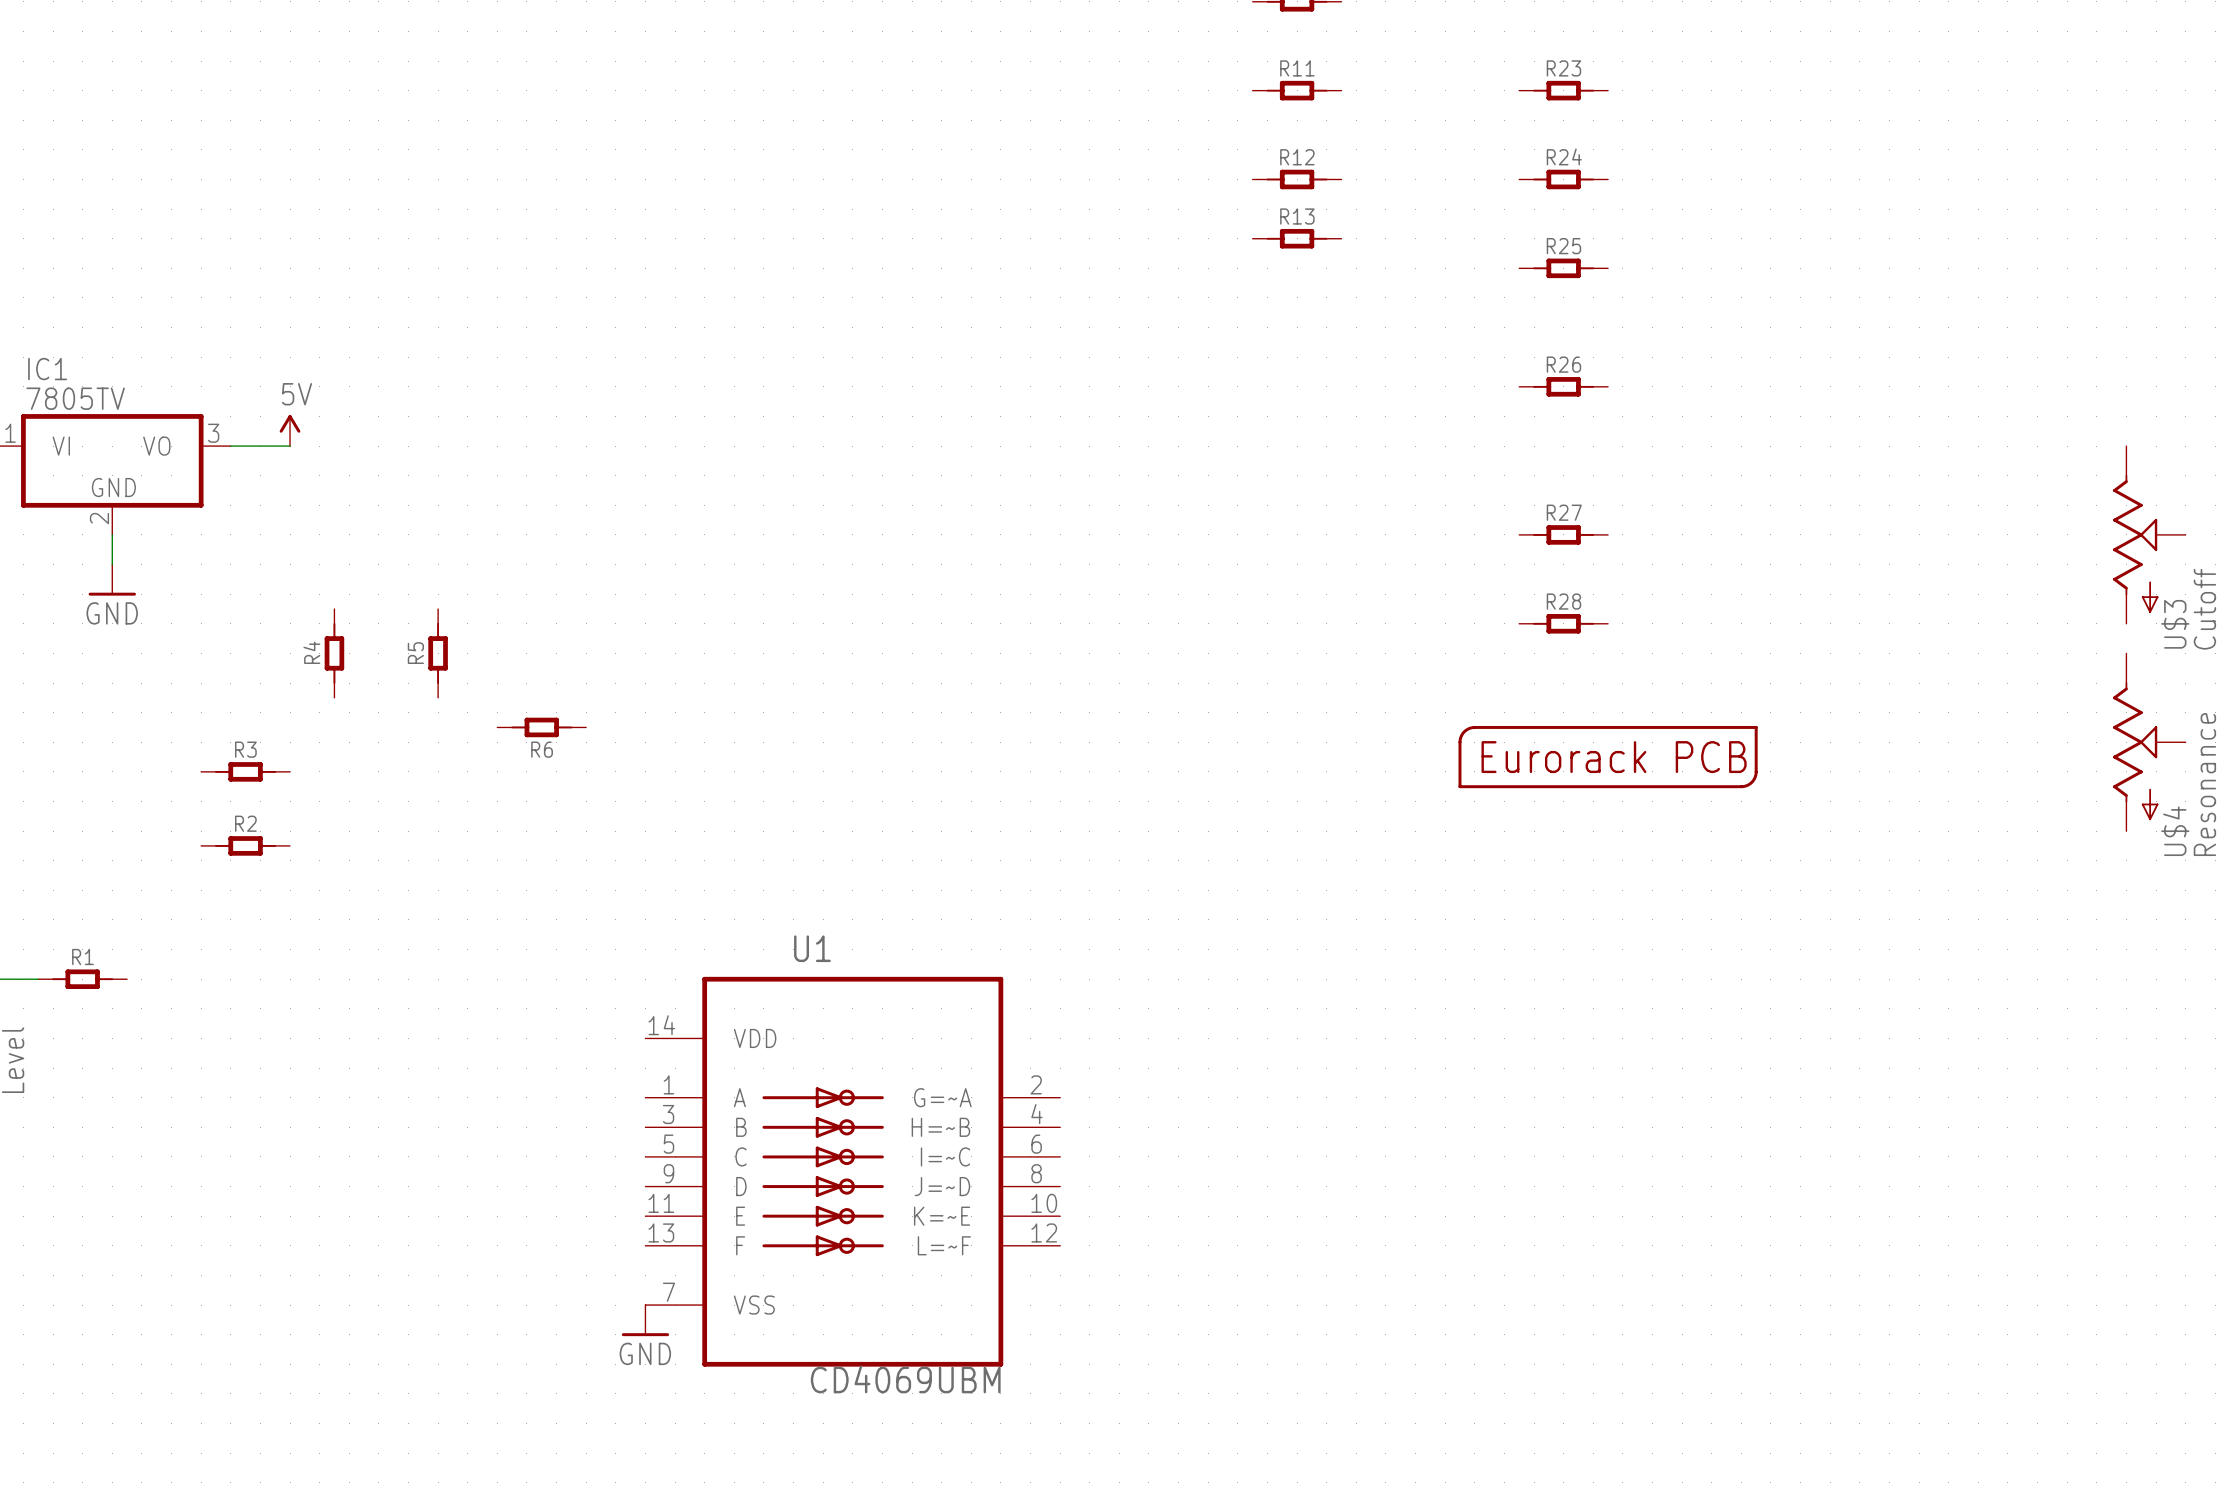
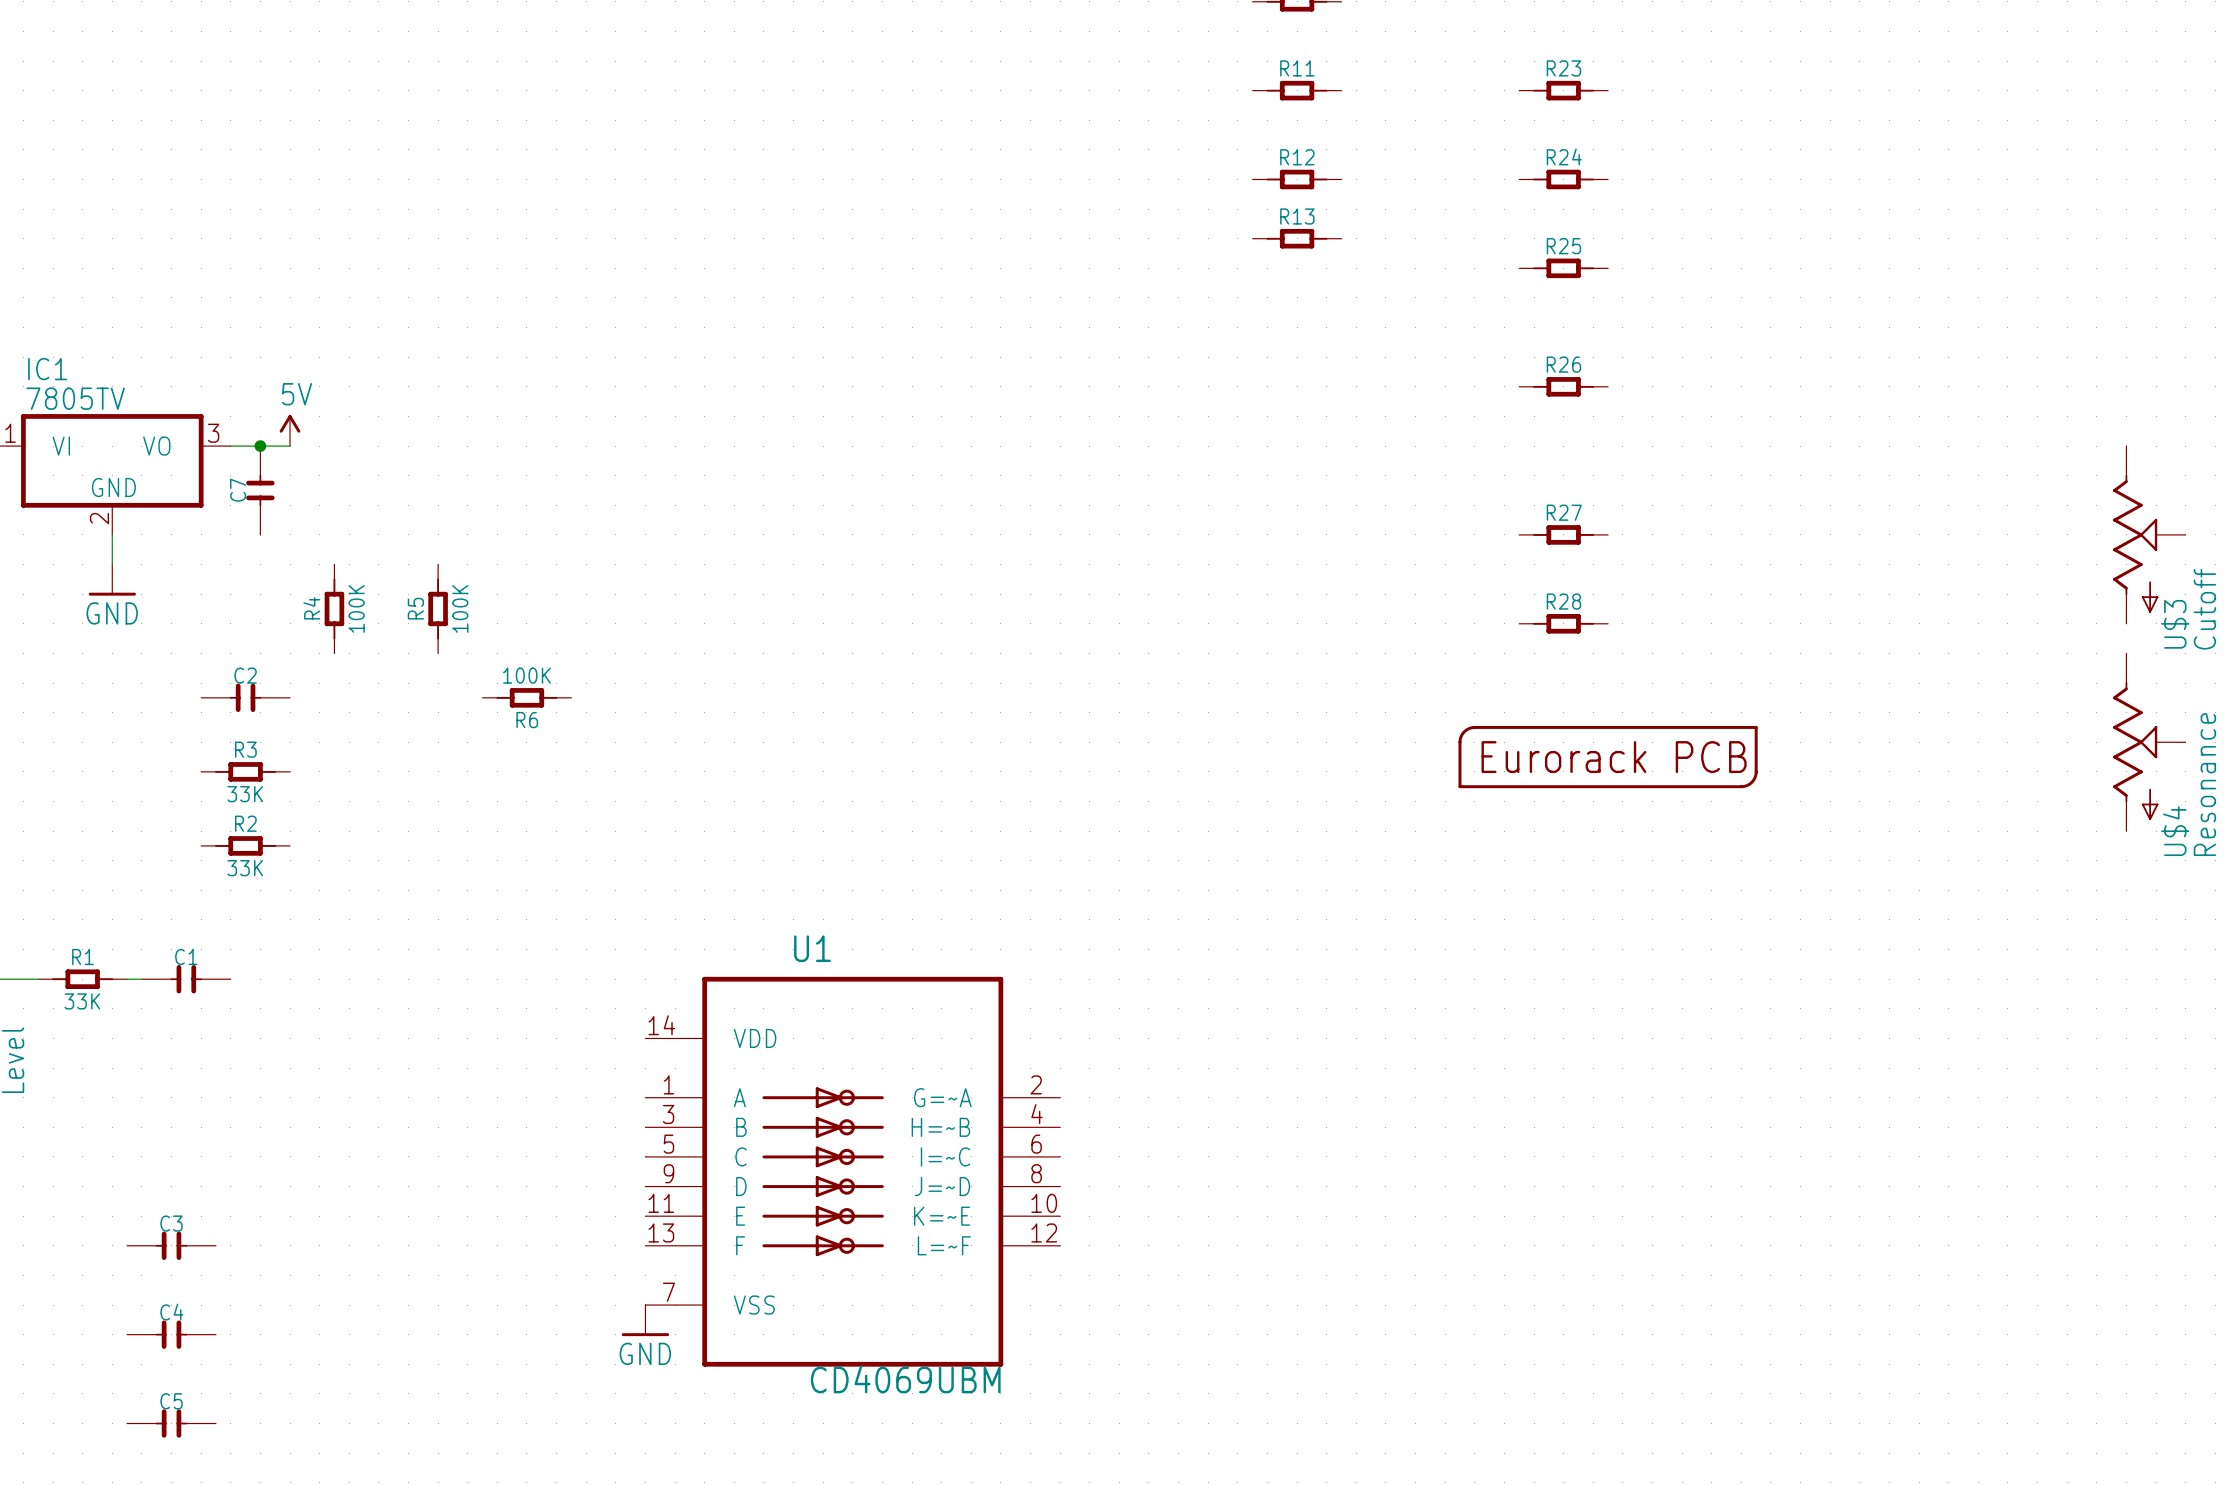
junction: none -> (260, 446)
C7: none -> (260, 490)
R4 value: none -> 100K (356, 608)
R5 value: none -> 100K (460, 608)
R4 position: (334, 653) -> (334, 608)
R5 position: (438, 653) -> (438, 608)
R6 value: none -> 100K (526, 675)
C2: none -> (245, 697)
R6 position: (541, 727) -> (526, 697)
R3 value: none -> 33K (245, 794)
R2 value: none -> 33K (245, 868)
wire: none -> (127, 979) (141, 979)
C1: none -> (186, 979)
R1 value: none -> 33K (82, 1001)
C3: none -> (171, 1245)
C4: none -> (171, 1334)
C5: none -> (171, 1423)

